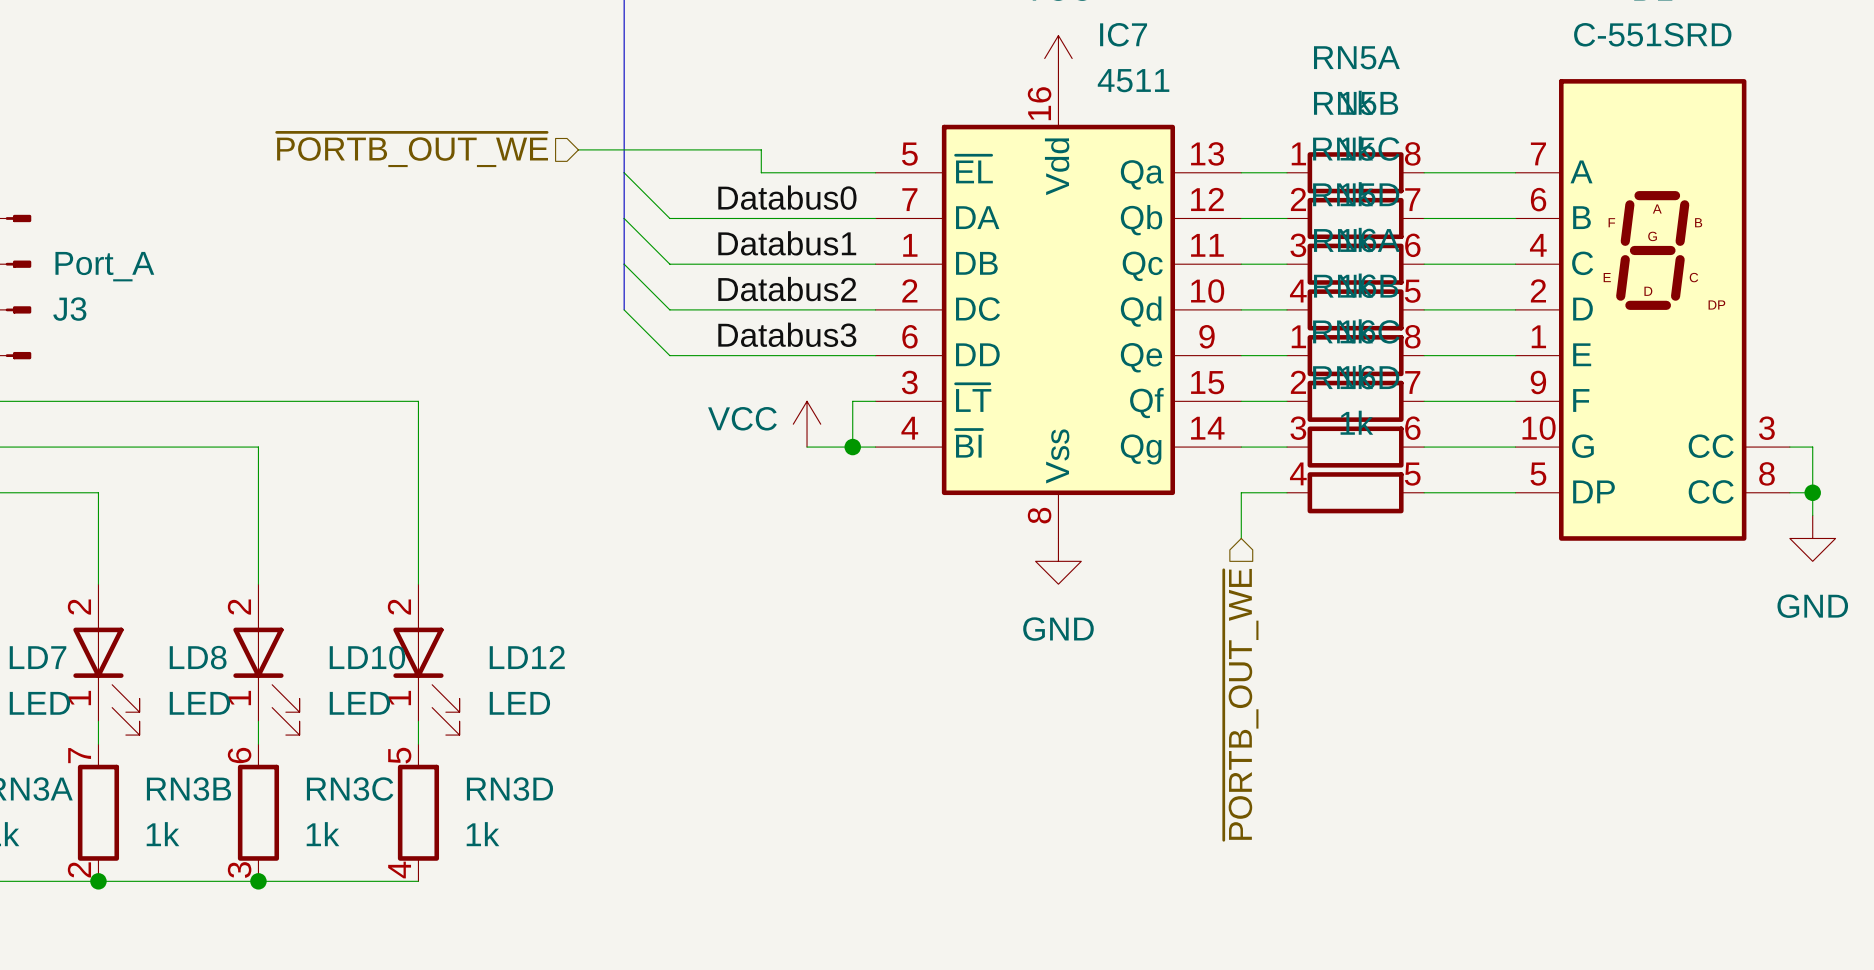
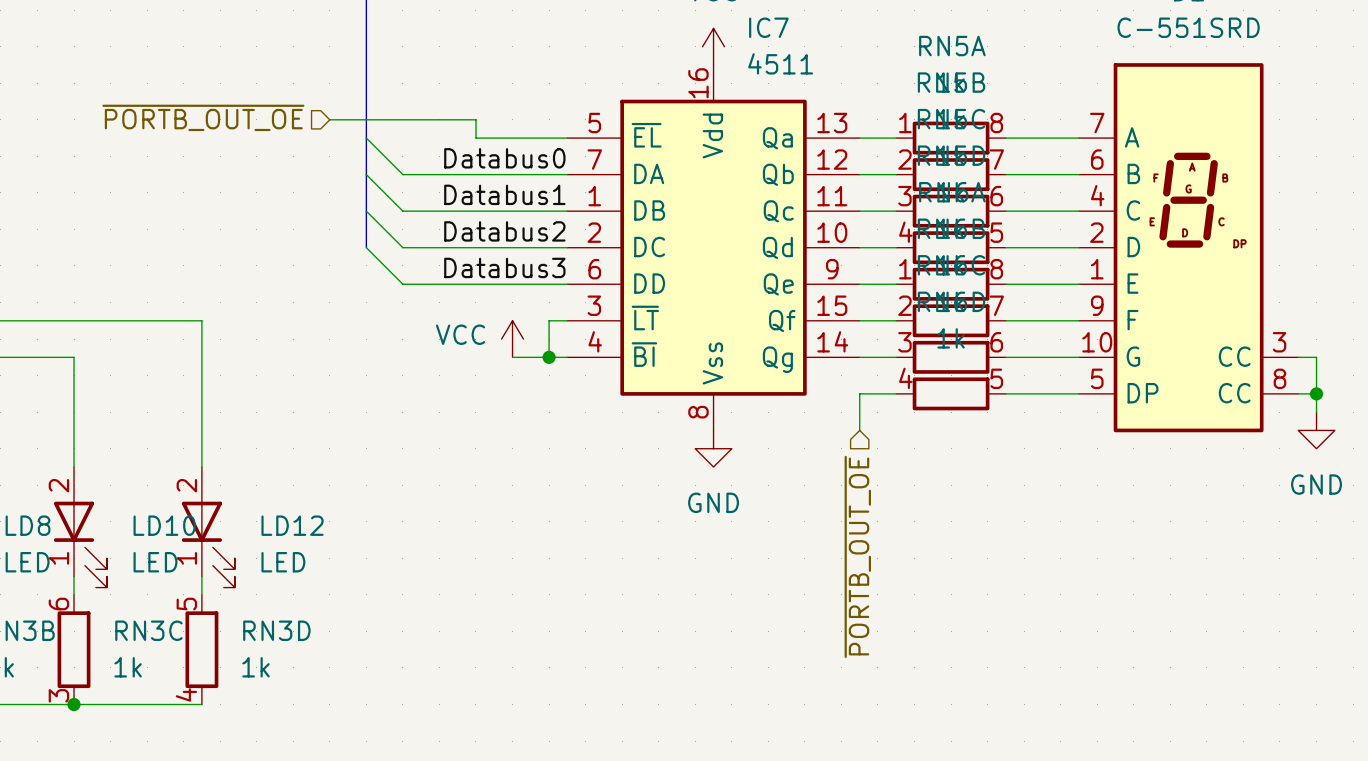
hierarchical label: ~{PORTB_OUT_WE} (412, 149) -> ~{PORTB_OUT_OE} (203, 117)
hierarchical label: ~{PORTB_OUT_WE} (1241, 704) -> ~{PORTB_OUT_OE} (857, 556)

